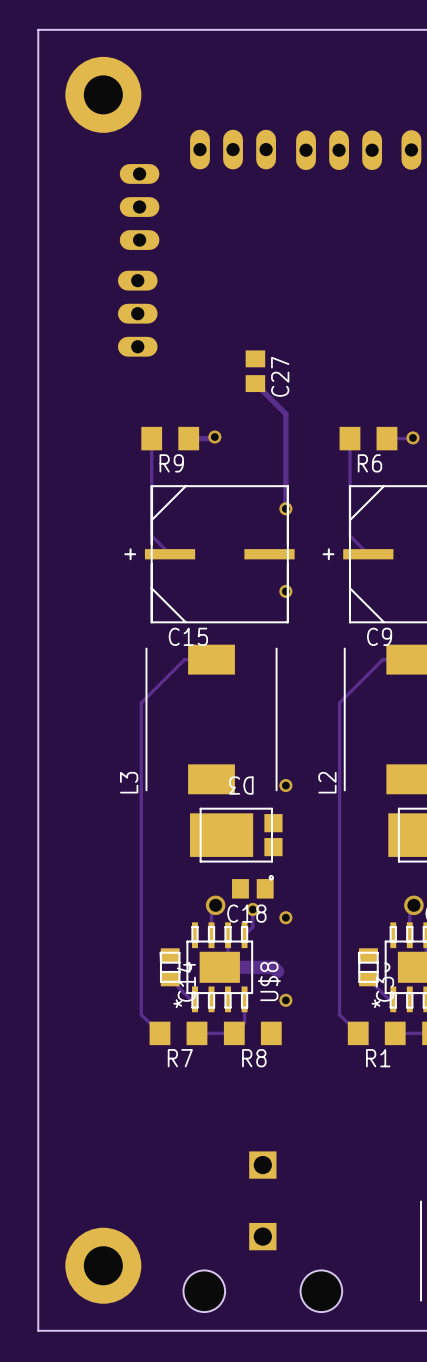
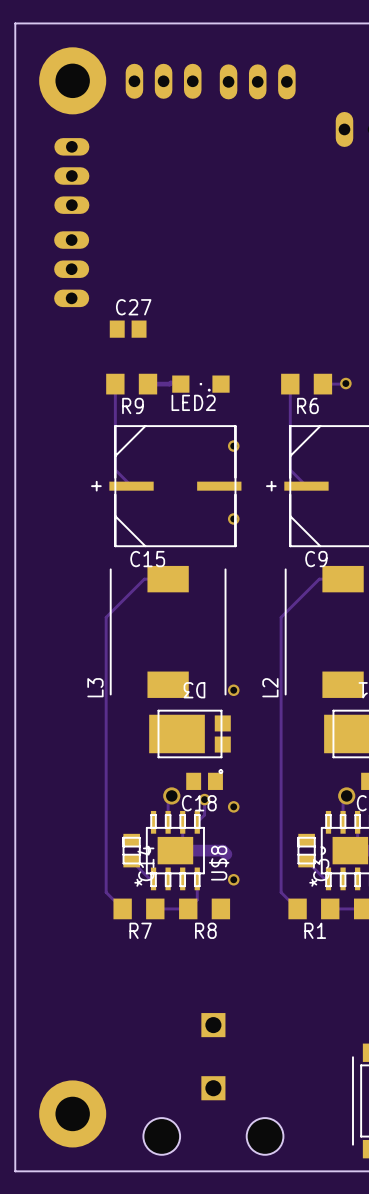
part: none -> (163, 81)
part: none -> (257, 81)
part: (233, 149) -> none
part: (339, 150) -> none
part position: (139, 207) -> (71, 175)
part position: (137, 313) -> (71, 269)
C27 rotation: 0° (255, 371) -> 90° clockwise (128, 329)
C27 position: (255, 371) -> (128, 329)
C27 name position: C27 (280, 376) -> C27 (133, 307)
track: (255, 383) (285, 414) (285, 508) -> none
via: (214, 437) -> none
LED2: none -> (200, 384)

